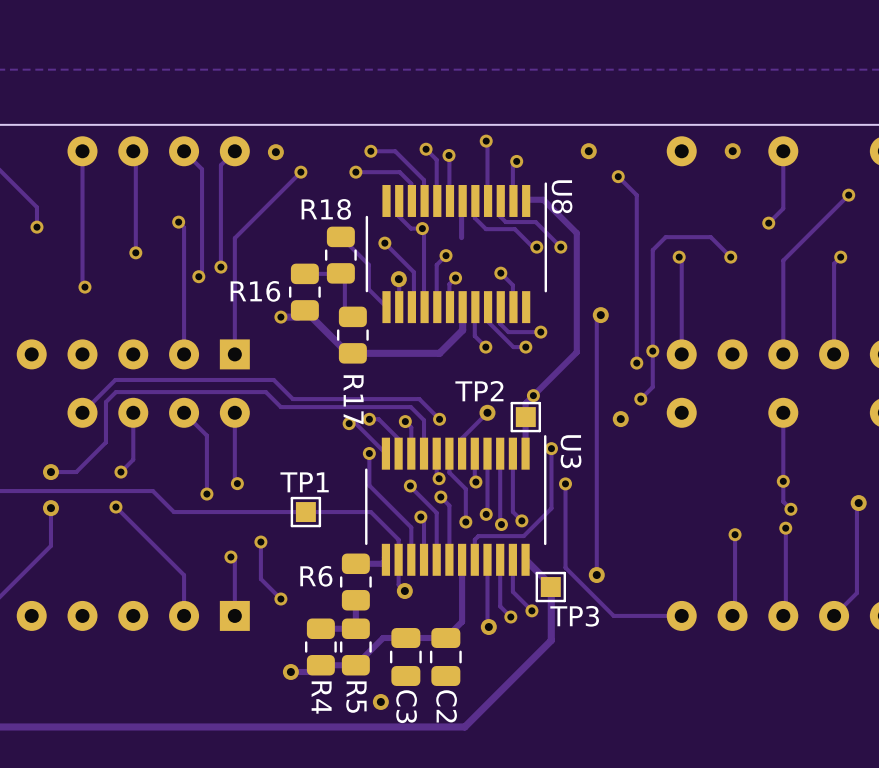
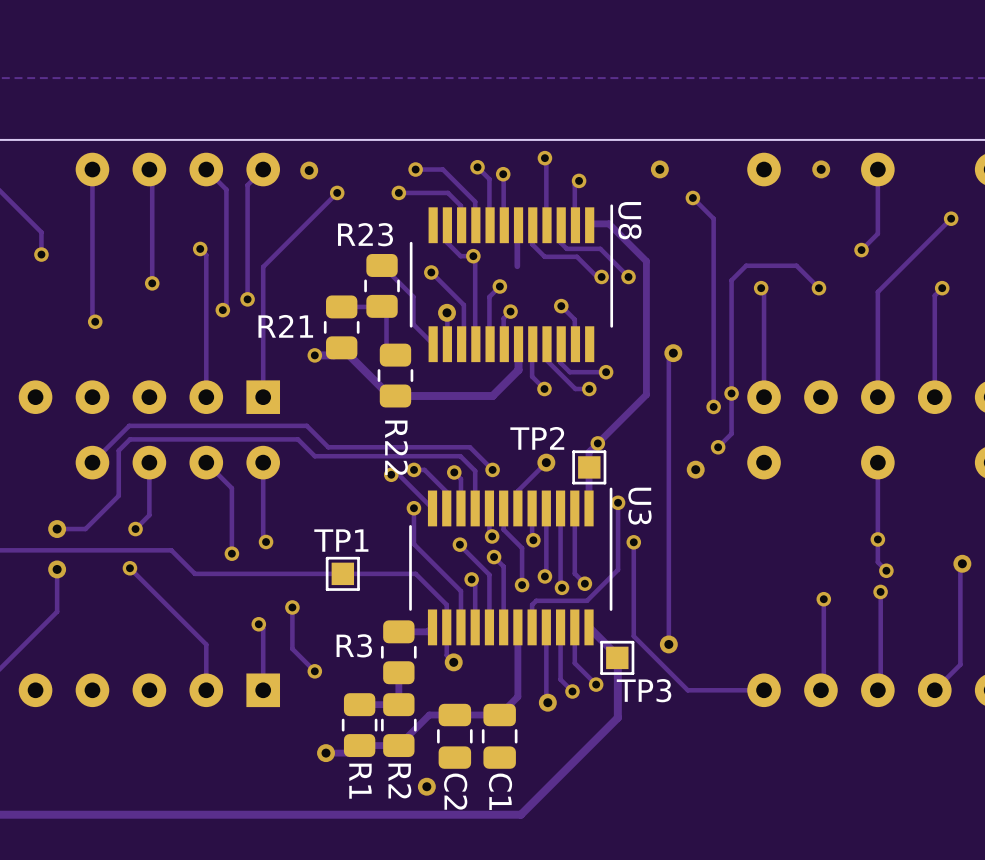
R18 name: R18 (326, 209) -> R23 (365, 234)
R16 name: R16 (255, 291) -> R21 (285, 326)
R17 name: R17 (353, 399) -> R22 (396, 447)
R6 name: R6 (316, 576) -> R3 (354, 645)
R4 name: R4 (321, 697) -> R1 (360, 781)
R5 name: R5 (356, 697) -> R2 (399, 781)
C3 name: C3 (406, 706) -> C2 (455, 791)
C2 name: C2 (446, 706) -> C1 (500, 791)

